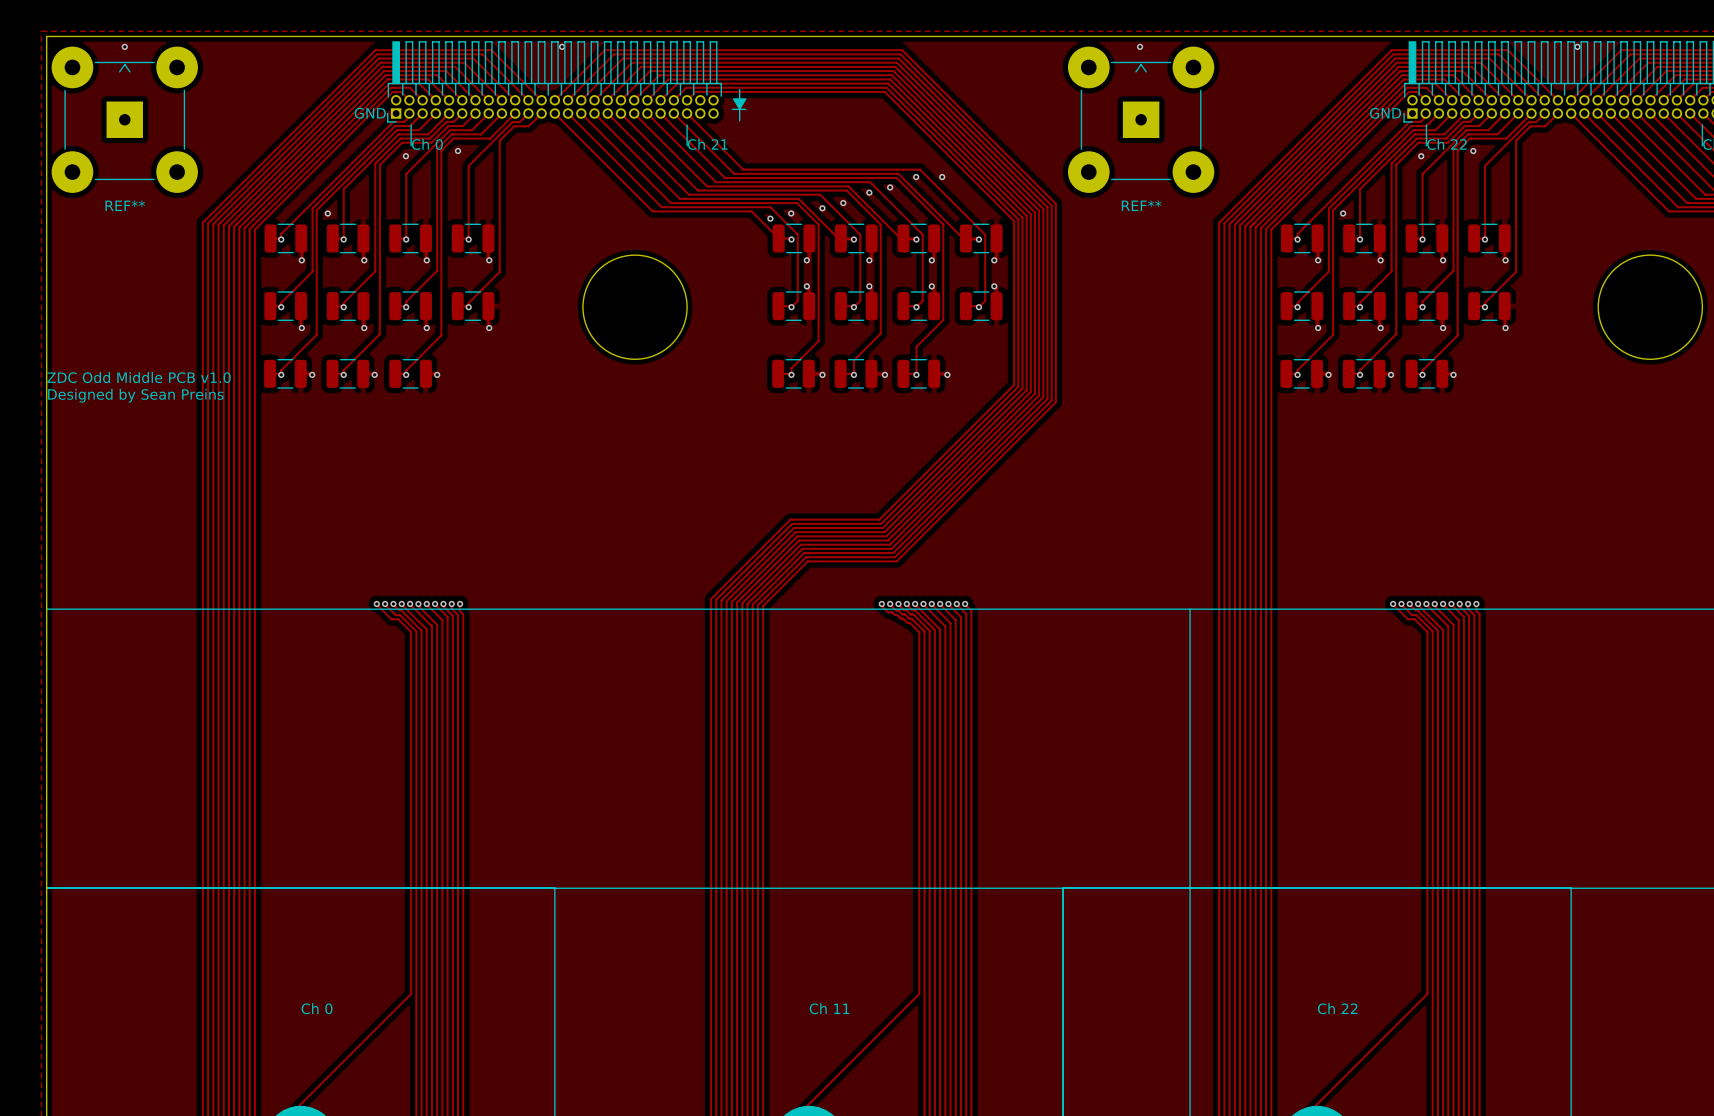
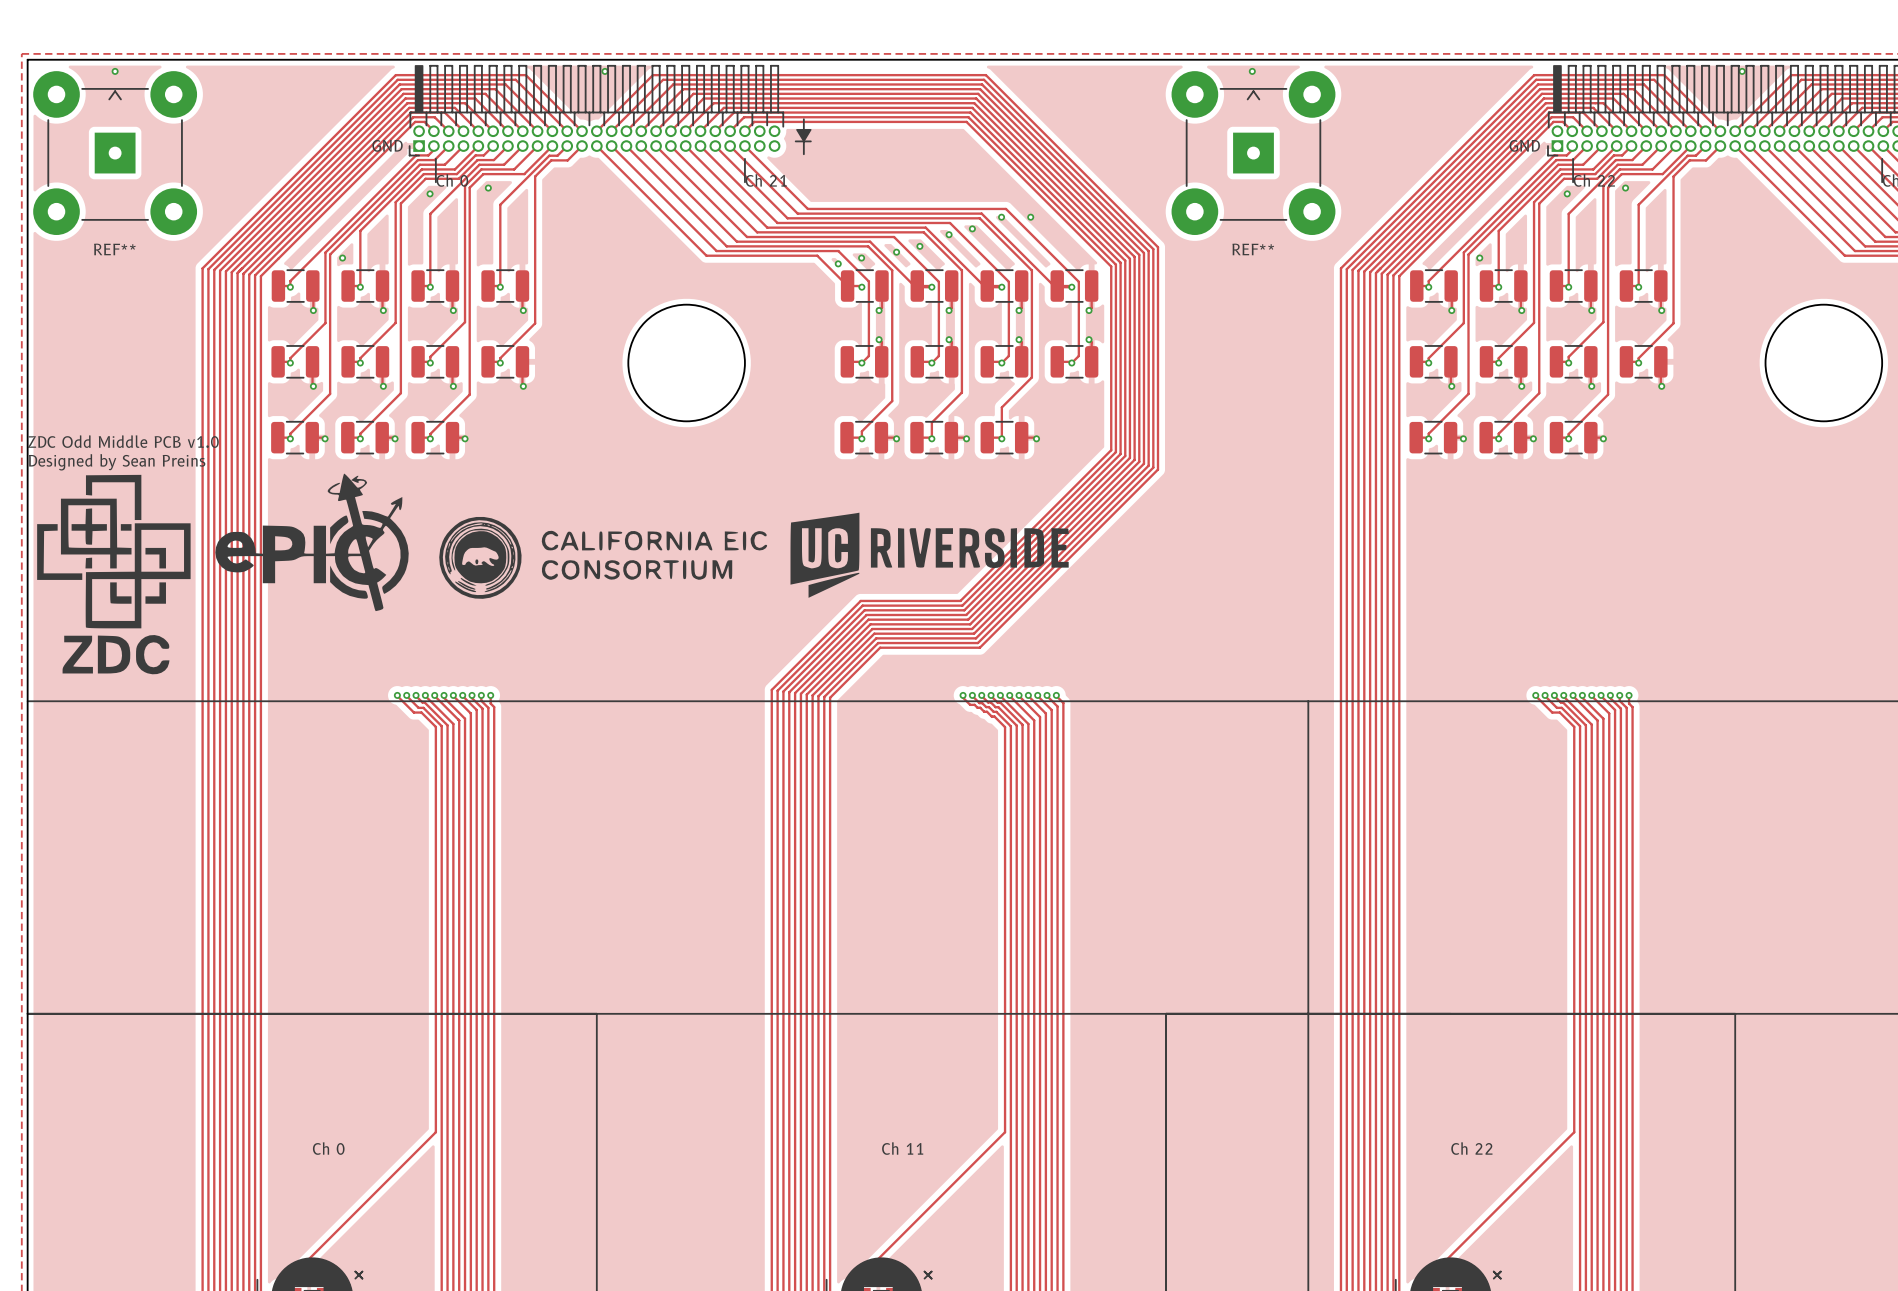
drawing: none -> [37, 473, 1069, 675]

